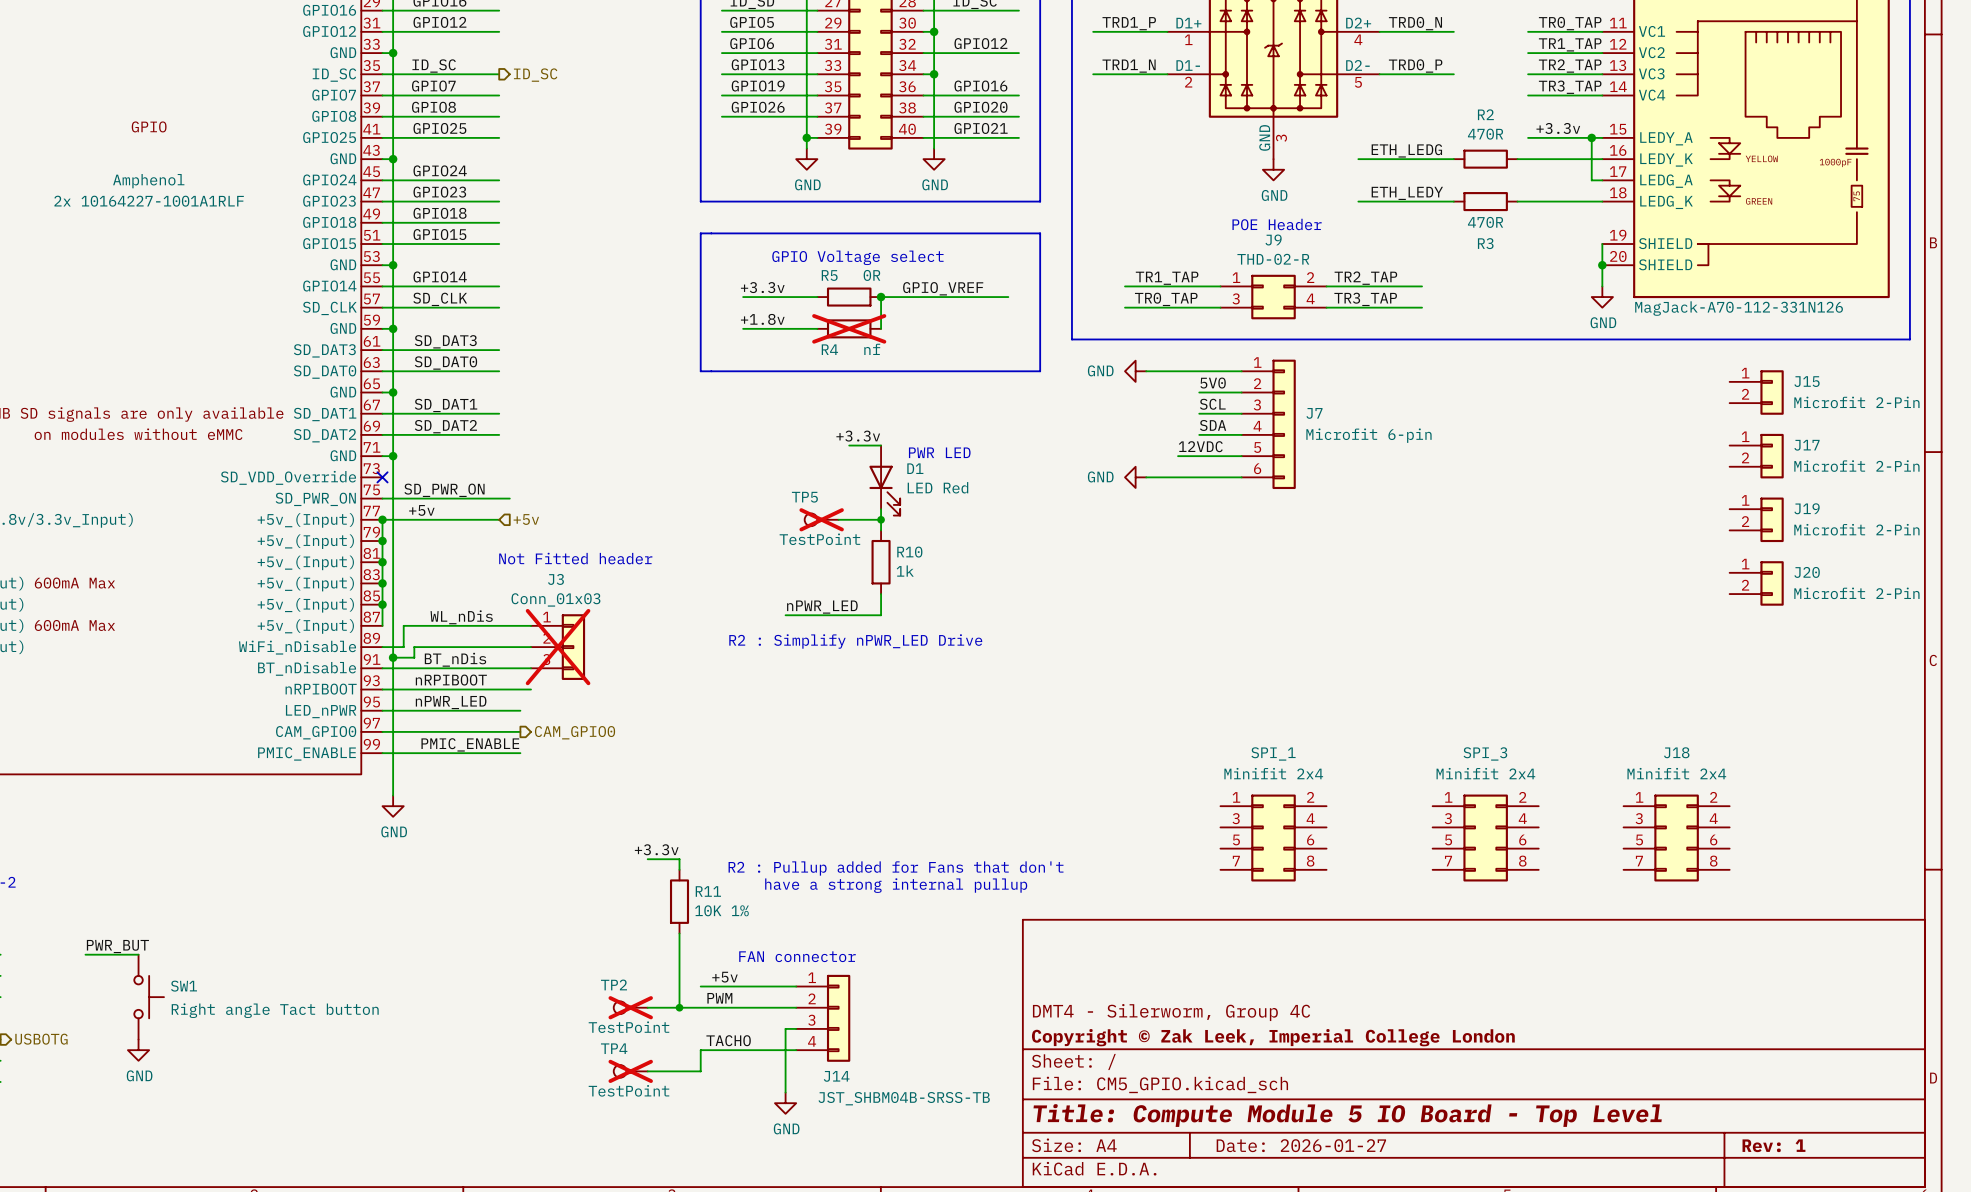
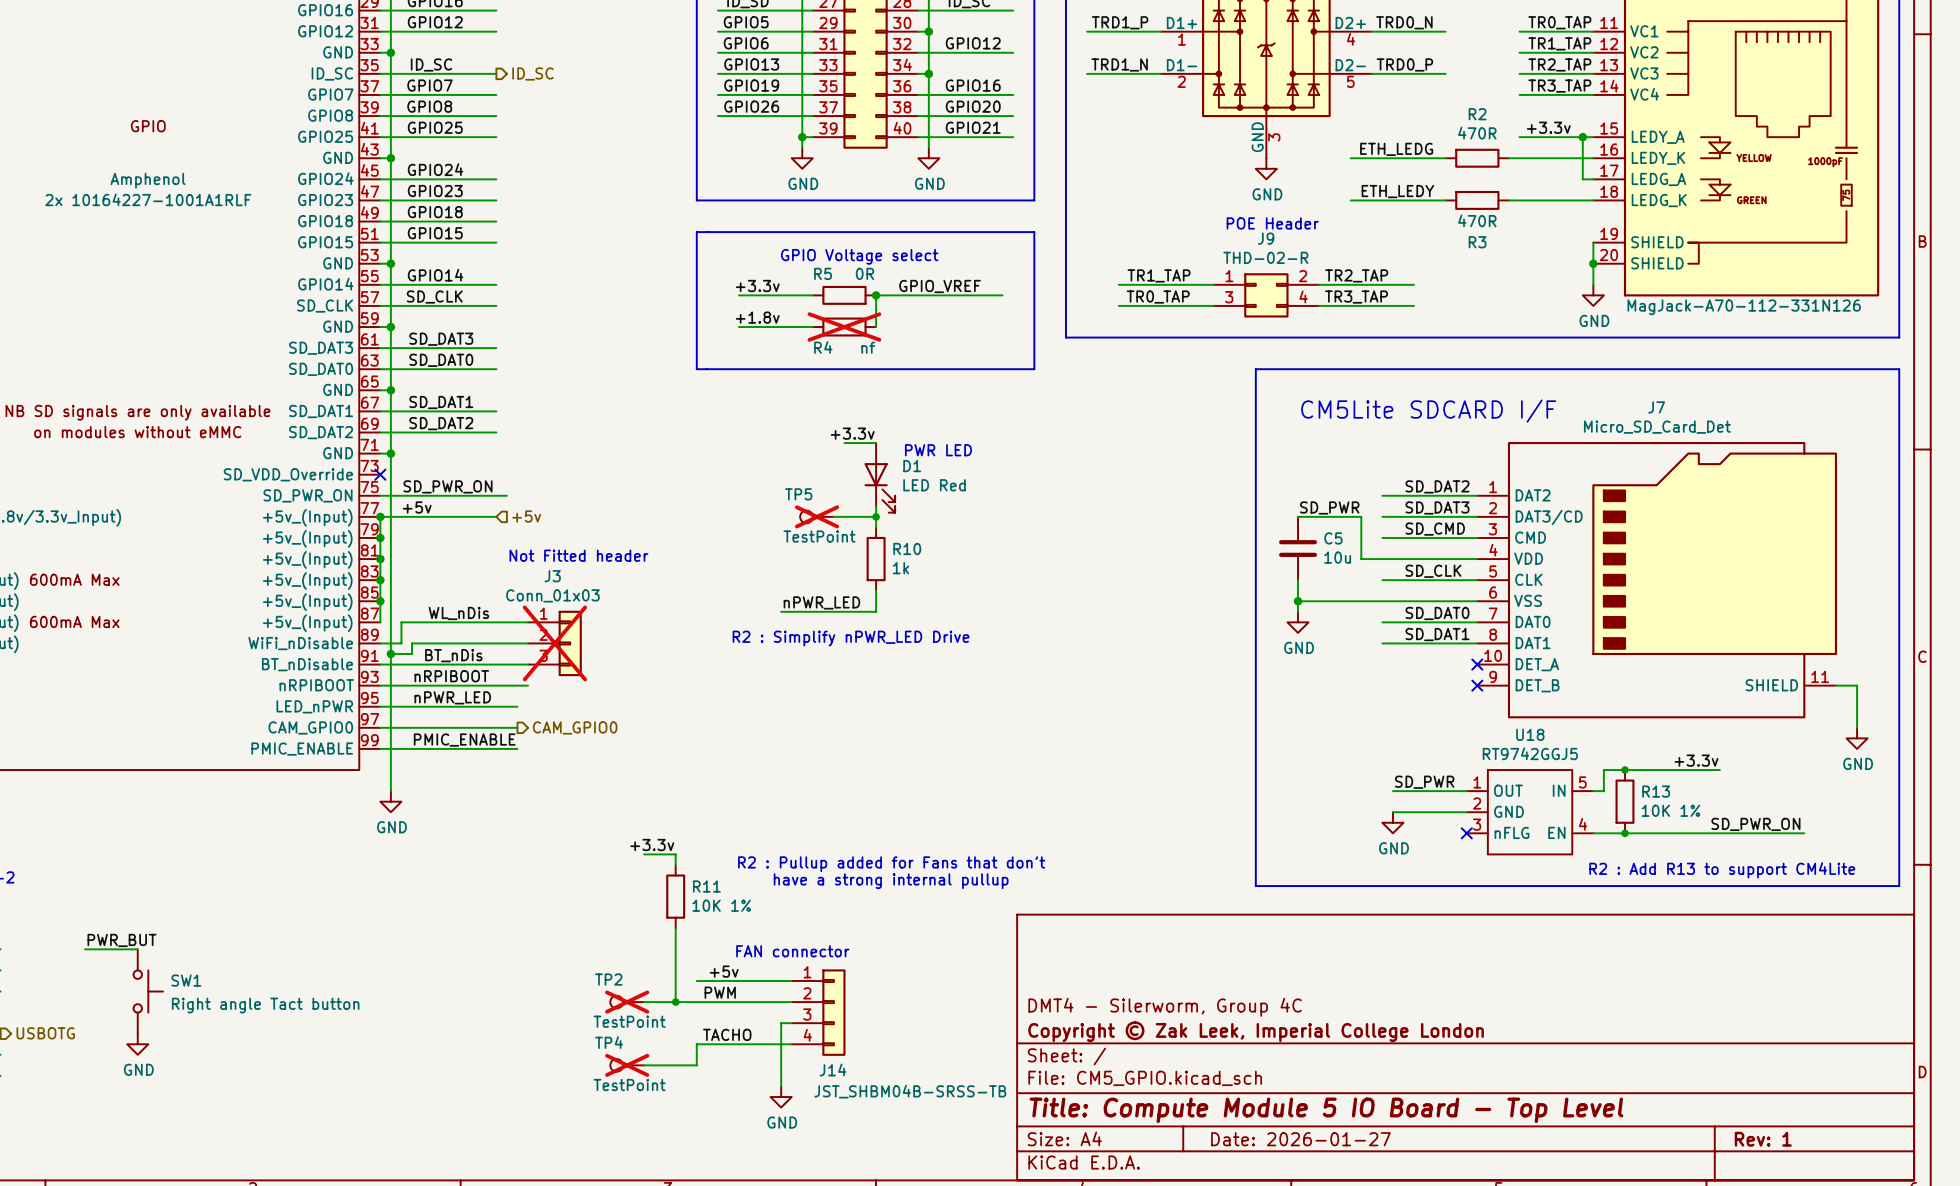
J7 symbol: [1241, 359, 1296, 490] -> [1477, 441, 1838, 719]
power symbol: GND (1135, 371) -> none
wire: (1146, 371) (1241, 371) -> none
line: none -> (1255, 369) (1255, 886) (1899, 886) (1899, 369) (1255, 369)
label: 5V0 (1213, 383) -> none
wire: (1199, 392) (1241, 392) -> none
J15: Microfit 2-Pin (1756, 392) -> none
label: SCL (1212, 404) -> none
text: none -> CM5Lite SDCARD I/F (1428, 411)
wire: (1199, 413) (1241, 413) -> none
J7 name position: J7 (1314, 413) -> J7 (1656, 407)
label: SDA (1213, 425) -> none
wire: (1199, 434) (1241, 434) -> none
J7 value: Microfit 6-pin (1368, 435) -> Micro_SD_Card_Det (1657, 427)
label: 12VDC (1200, 446) -> none
wire: (1178, 456) (1241, 456) -> none
J17: Microfit 2-Pin (1756, 456) -> none
power symbol: GND (1135, 477) -> none
wire: (1146, 477) (1241, 477) -> none
label: none -> SD_DAT2 (1437, 486)
wire: none -> (1382, 495) (1477, 495)
label: none -> SD_PWR (1329, 507)
label: none -> SD_DAT3 (1437, 507)
wire: none -> (1298, 516) (1361, 516) (1361, 559) (1477, 559)
wire: none -> (1382, 516) (1477, 516)
J19: Microfit 2-Pin (1756, 519) -> none
label: none -> SD_CMD (1435, 529)
wire: none -> (1382, 537) (1477, 537)
C5: none -> 10u (1298, 548)
label: none -> SD_CLK (1433, 571)
wire: none -> (1298, 580) (1298, 611)
wire: none -> (1382, 580) (1477, 580)
J20: Microfit 2-Pin (1756, 583) -> none
wire: none -> (1298, 601) (1477, 601)
junction: none -> (1298, 601)
label: none -> SD_DAT0 (1437, 613)
power symbol: none -> GND (1298, 622)
wire: none -> (1382, 622) (1477, 622)
label: none -> SD_DAT1 (1437, 634)
wire: none -> (1382, 643) (1477, 643)
no-connect mark: none -> (1477, 664)
no-connect mark: none -> (1477, 685)
wire: none -> (1835, 685) (1857, 685) (1857, 727)
power symbol: none -> GND (1857, 738)
label: none -> +3.3v (1696, 760)
junction: none -> (1625, 770)
wire: none -> (1719, 770) (1603, 770) (1603, 791) (1593, 791)
label: none -> SD_PWR (1424, 782)
wire: none -> (1392, 791) (1466, 791)
R13: none -> 10K 1% (1625, 801)
wire: none -> (1392, 812) (1466, 812)
U18: none -> RT9742GGJ5 (1530, 812)
power symbol: none -> GND (1392, 822)
label: none -> SD_PWR_ON (1755, 824)
SPI_1: Minifit 2x4 (1273, 838) -> none
no-connect mark: none -> (1466, 833)
SPI_3: Minifit 2x4 (1485, 838) -> none
wire: none -> (1593, 833) (1804, 833)
junction: none -> (1625, 833)
J18: Minifit 2x4 (1676, 838) -> none
text: none -> R2 : Add R13 to support CM4Lite (1722, 870)

